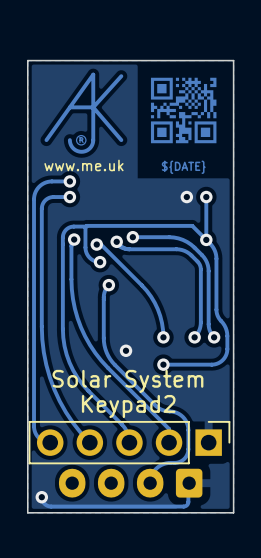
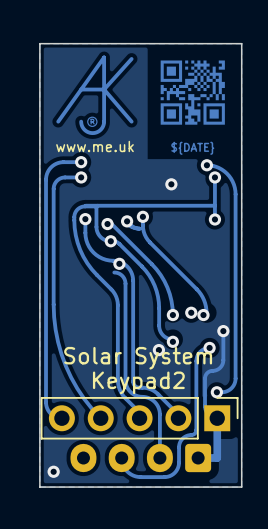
via: none -> (206, 165)
via: (186, 197) -> none
via: none -> (171, 184)
track: (192, 225) (211, 245) (215, 252) (216, 311) (225, 327) (227, 336) -> (206, 165) (215, 166) (224, 171) (231, 178) (234, 187) (235, 313)
track: (132, 237) (178, 238) (191, 244) (203, 257) (208, 268) (208, 326) (214, 337) -> (142, 216) (143, 228) (146, 237) (199, 291) (205, 303) (206, 312)
track: (74, 239) (71, 246) (71, 289) (77, 318) (85, 336) (101, 360) (169, 428) (169, 442) -> (85, 219) (85, 236) (91, 249) (102, 258) (123, 263) (132, 274) (133, 384) (137, 387) (148, 388) (156, 392) (176, 412) (178, 418)
track: (62, 240) (62, 329) (66, 354) (73, 370) (82, 384) (125, 428) (129, 442) -> (74, 220) (75, 235) (83, 256) (91, 269) (113, 291) (117, 299) (118, 383) (121, 392) (137, 410) (139, 418)
track: (129, 249) (179, 249) (189, 253) (198, 262) (200, 269) (200, 324) (194, 337) -> none
track: none -> (110, 240) (119, 244) (149, 275) (158, 296) (160, 330) (166, 337) (172, 339)
track: (108, 285) (103, 297) (103, 341) (108, 355) (157, 407) (179, 413) (187, 425) (188, 449) (186, 456) (179, 462) (165, 463) (157, 467) (152, 474) (150, 483) -> (114, 272) (122, 275) (125, 282) (126, 384) (132, 393) (149, 398) (158, 406) (159, 458)
via: none -> (191, 312)
via: (214, 337) -> none
track: (227, 349) (223, 358) (215, 364) (163, 364) -> (235, 326) (235, 382) (228, 390) (216, 392)
via: (126, 350) -> none
via: none -> (223, 331)
track: none -> (209, 347) (201, 350) (196, 357) (196, 431) (180, 441) (178, 464) (176, 471) (166, 476) (135, 476) (125, 469) (121, 458)
via: none -> (209, 347)
via: none -> (158, 350)
via: none -> (216, 392)
track: (189, 483) (188, 503) (184, 506) (51, 506) (44, 503) (41, 497) -> (198, 458) (217, 458) (217, 418) (209, 415) (205, 409) (205, 378) (208, 372) (218, 369) (222, 363) (223, 331)

